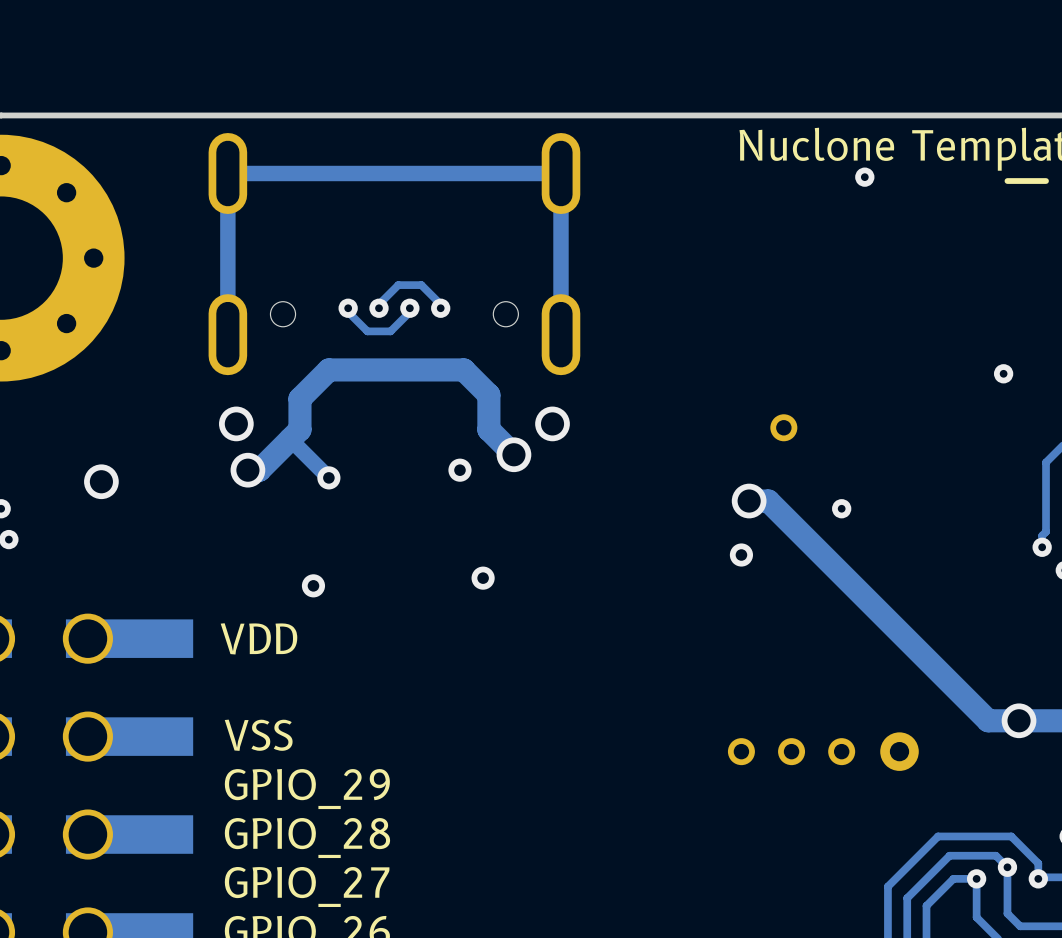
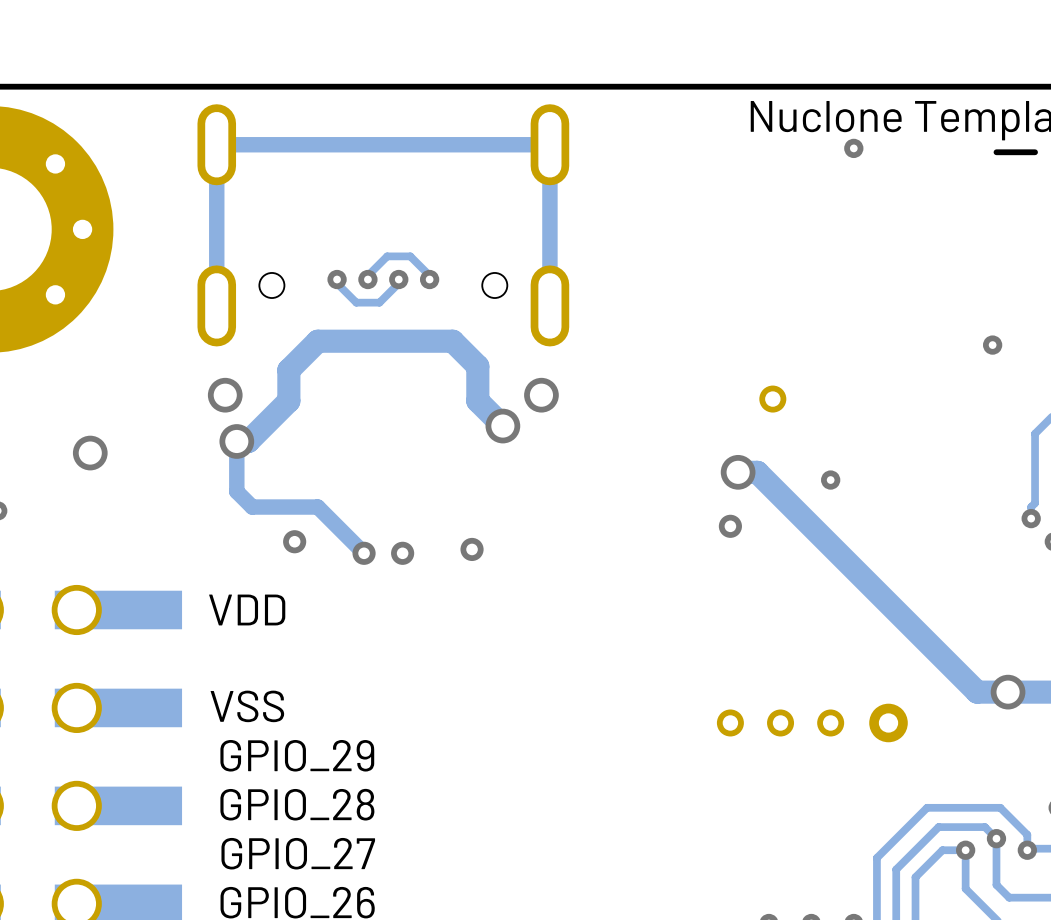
track: (290, 439) (328, 477) -> none
track: none -> (236, 441) (236, 491) (252, 507) (317, 507) (364, 553)
via: (459, 470) -> none
via: (328, 477) -> none
via: none -> (364, 553)
via: none -> (402, 553)
via position: (313, 585) -> (294, 541)

